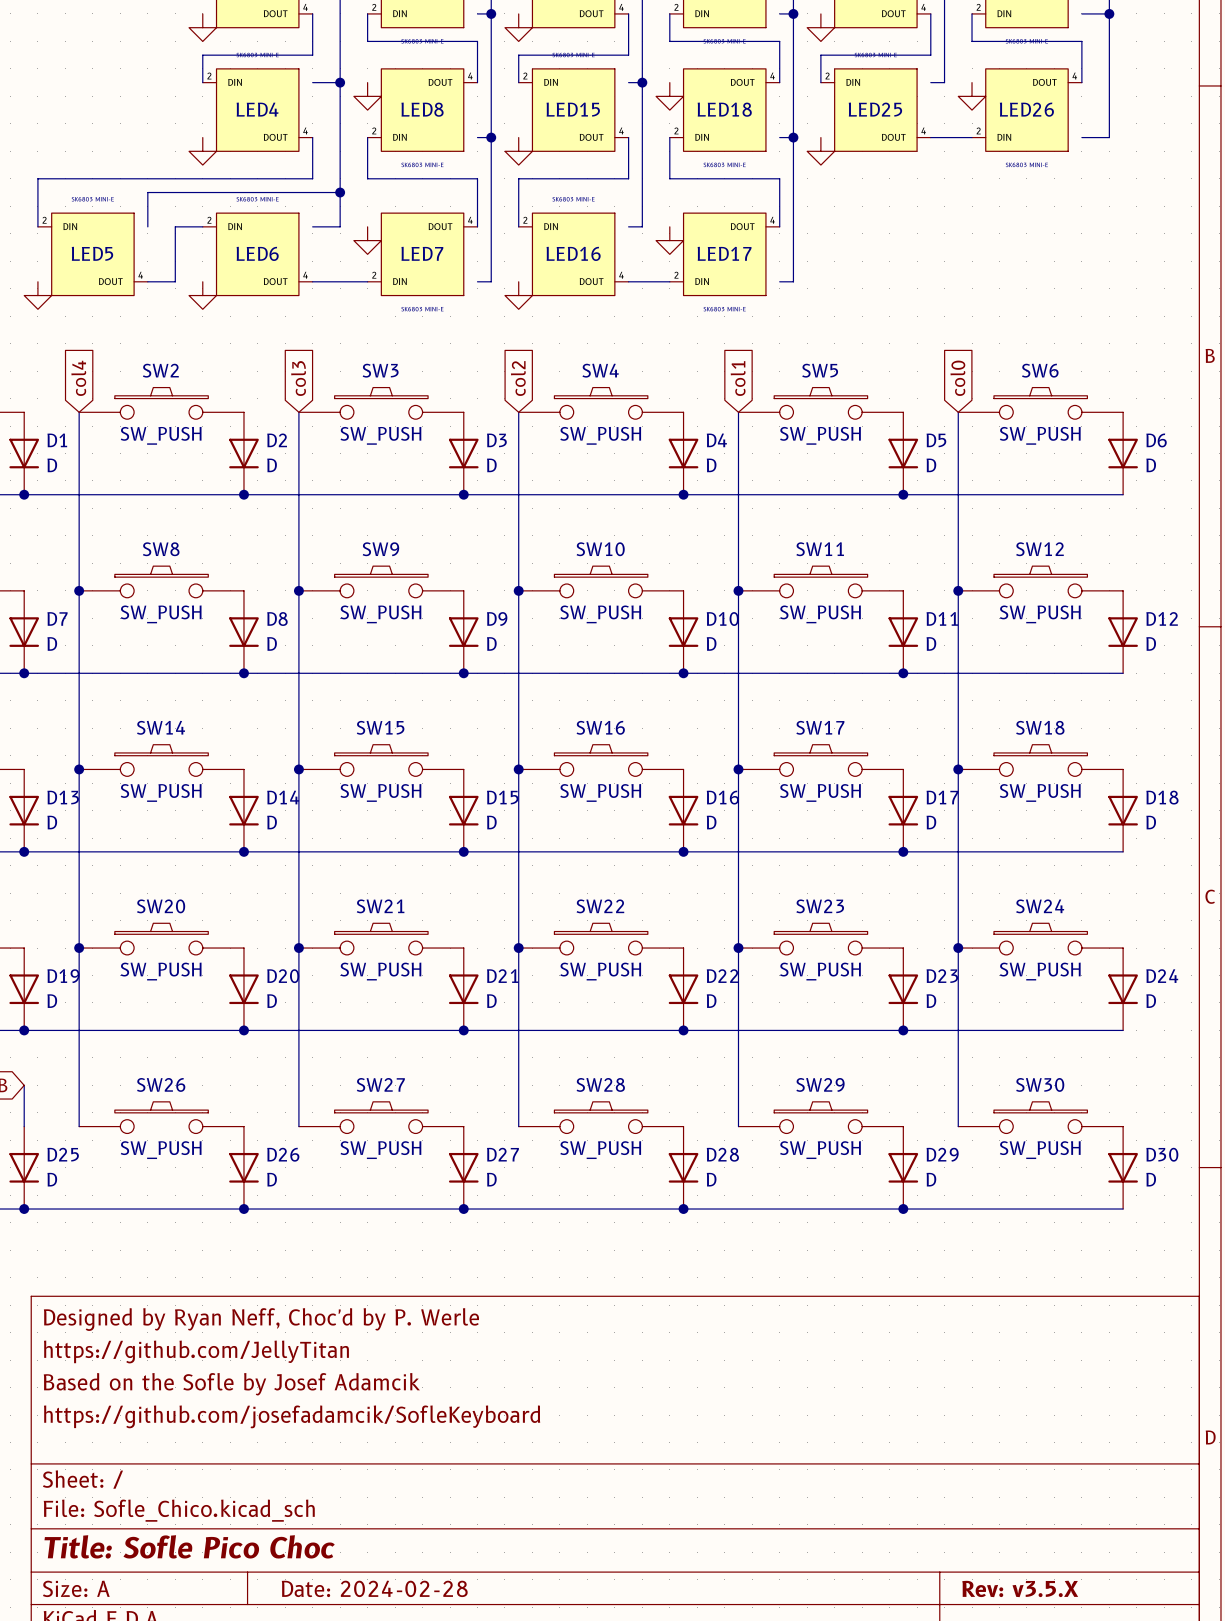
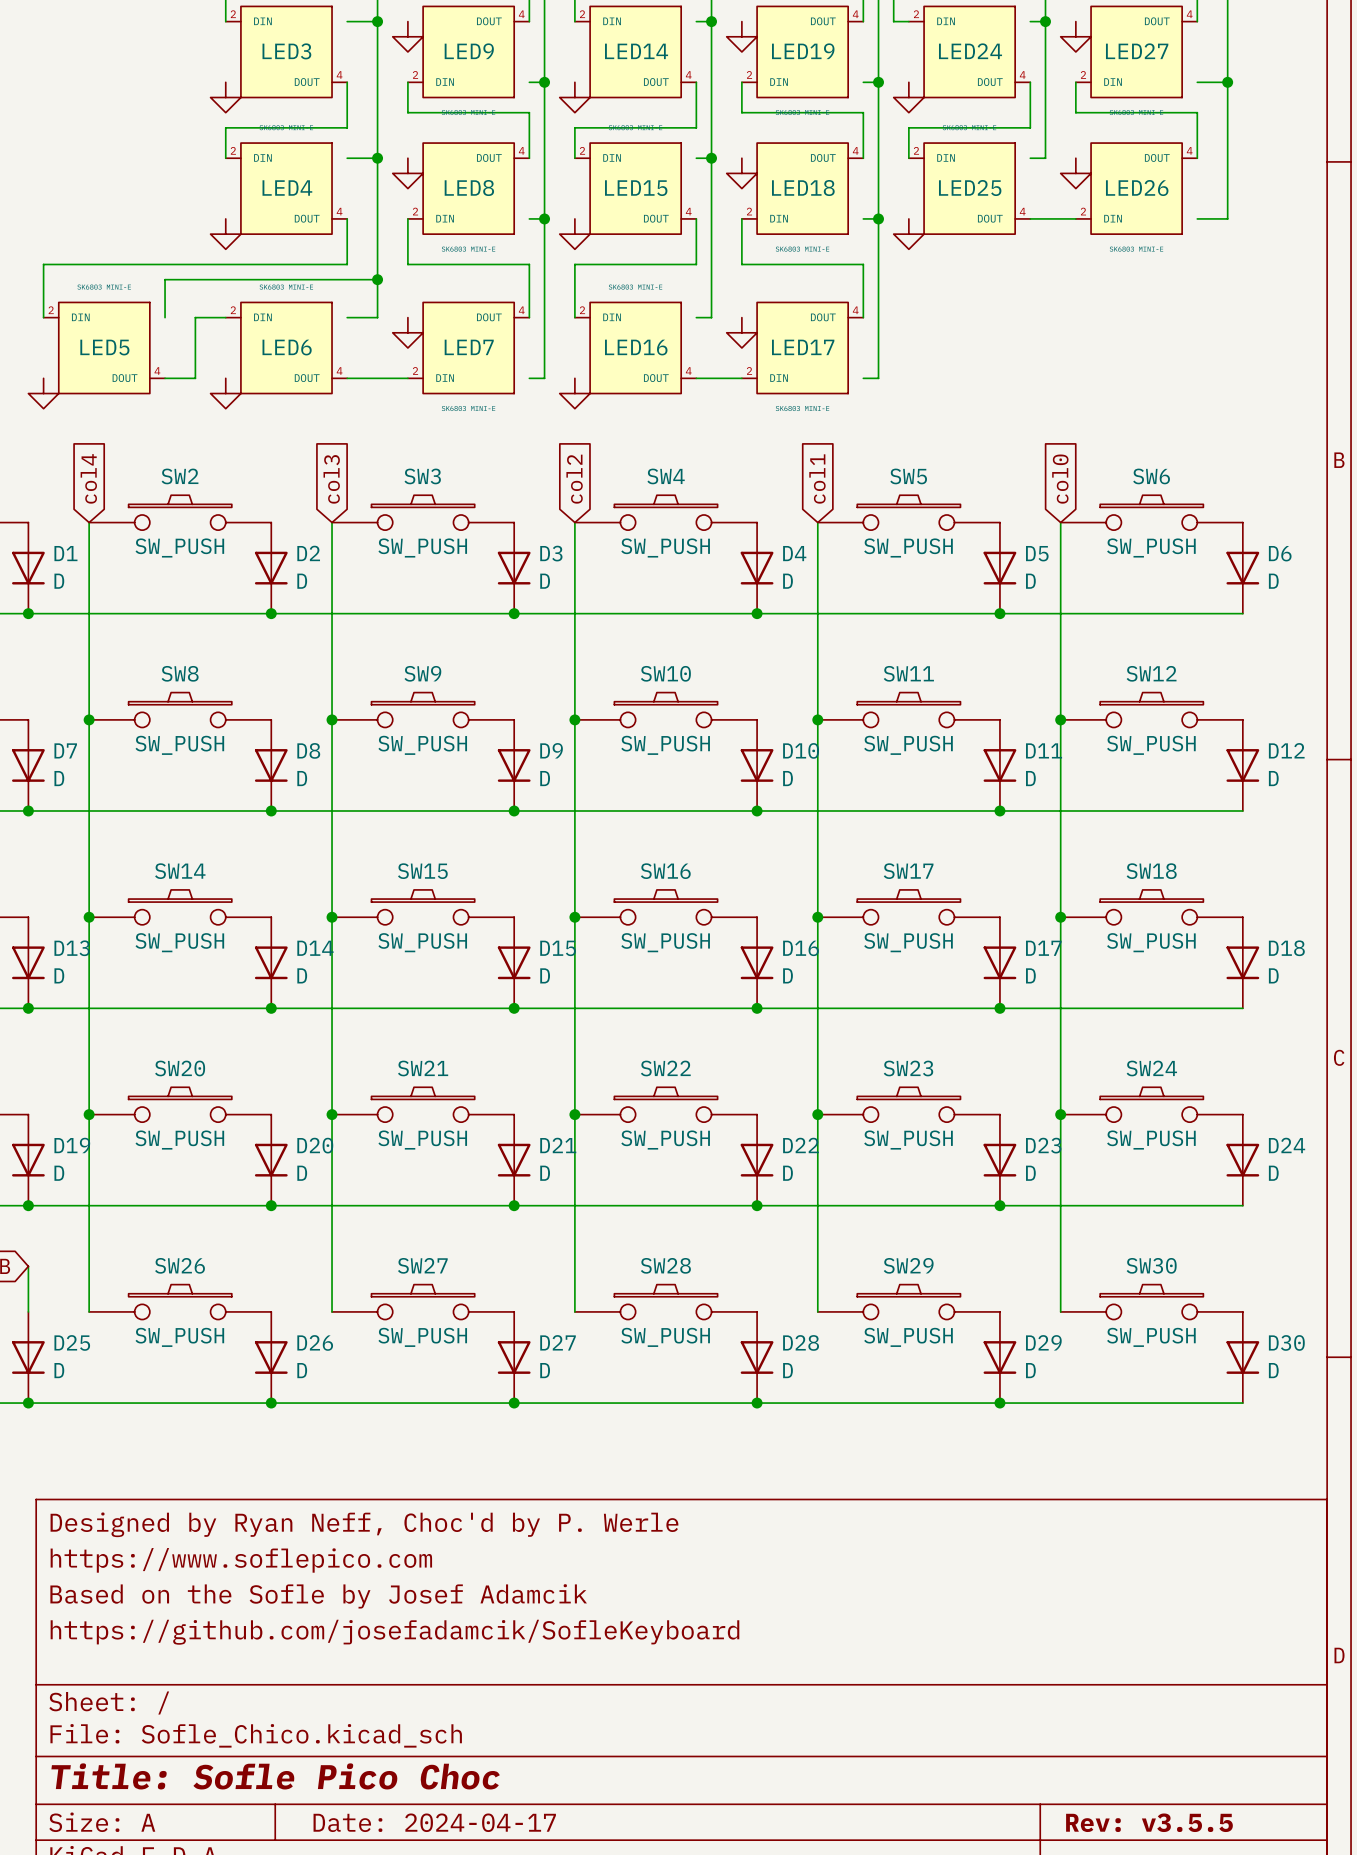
title block: https://github.com/JellyTitan (196, 1351) -> https://www.soflepico.com (241, 1560)
title block: Date: 2024-02-28 (374, 1588) -> Date: 2024-04-17 (434, 1822)
title block: Rev: v3.5.X (1020, 1588) -> Rev: v3.5.5 (1149, 1822)

